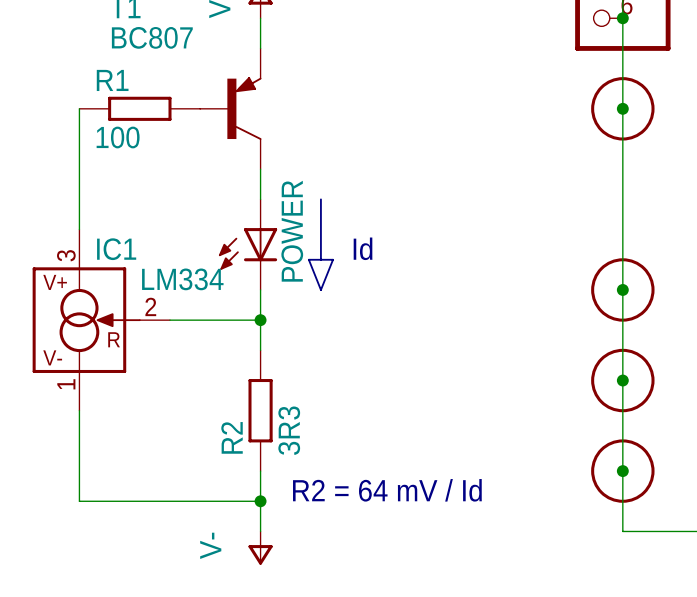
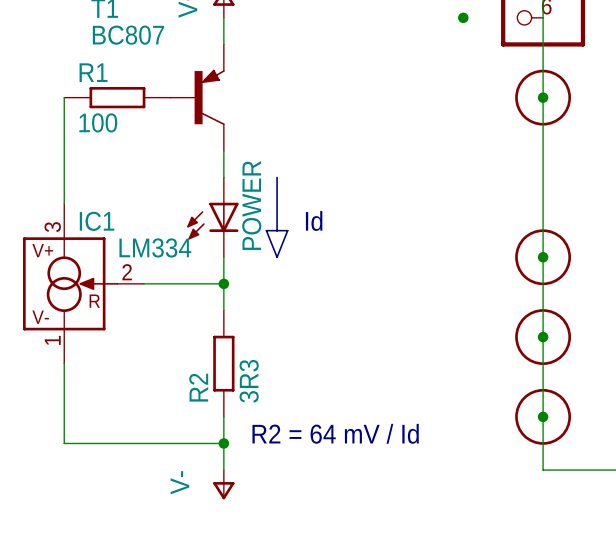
junction: none -> (463, 17)
junction: (622, 18) -> none

